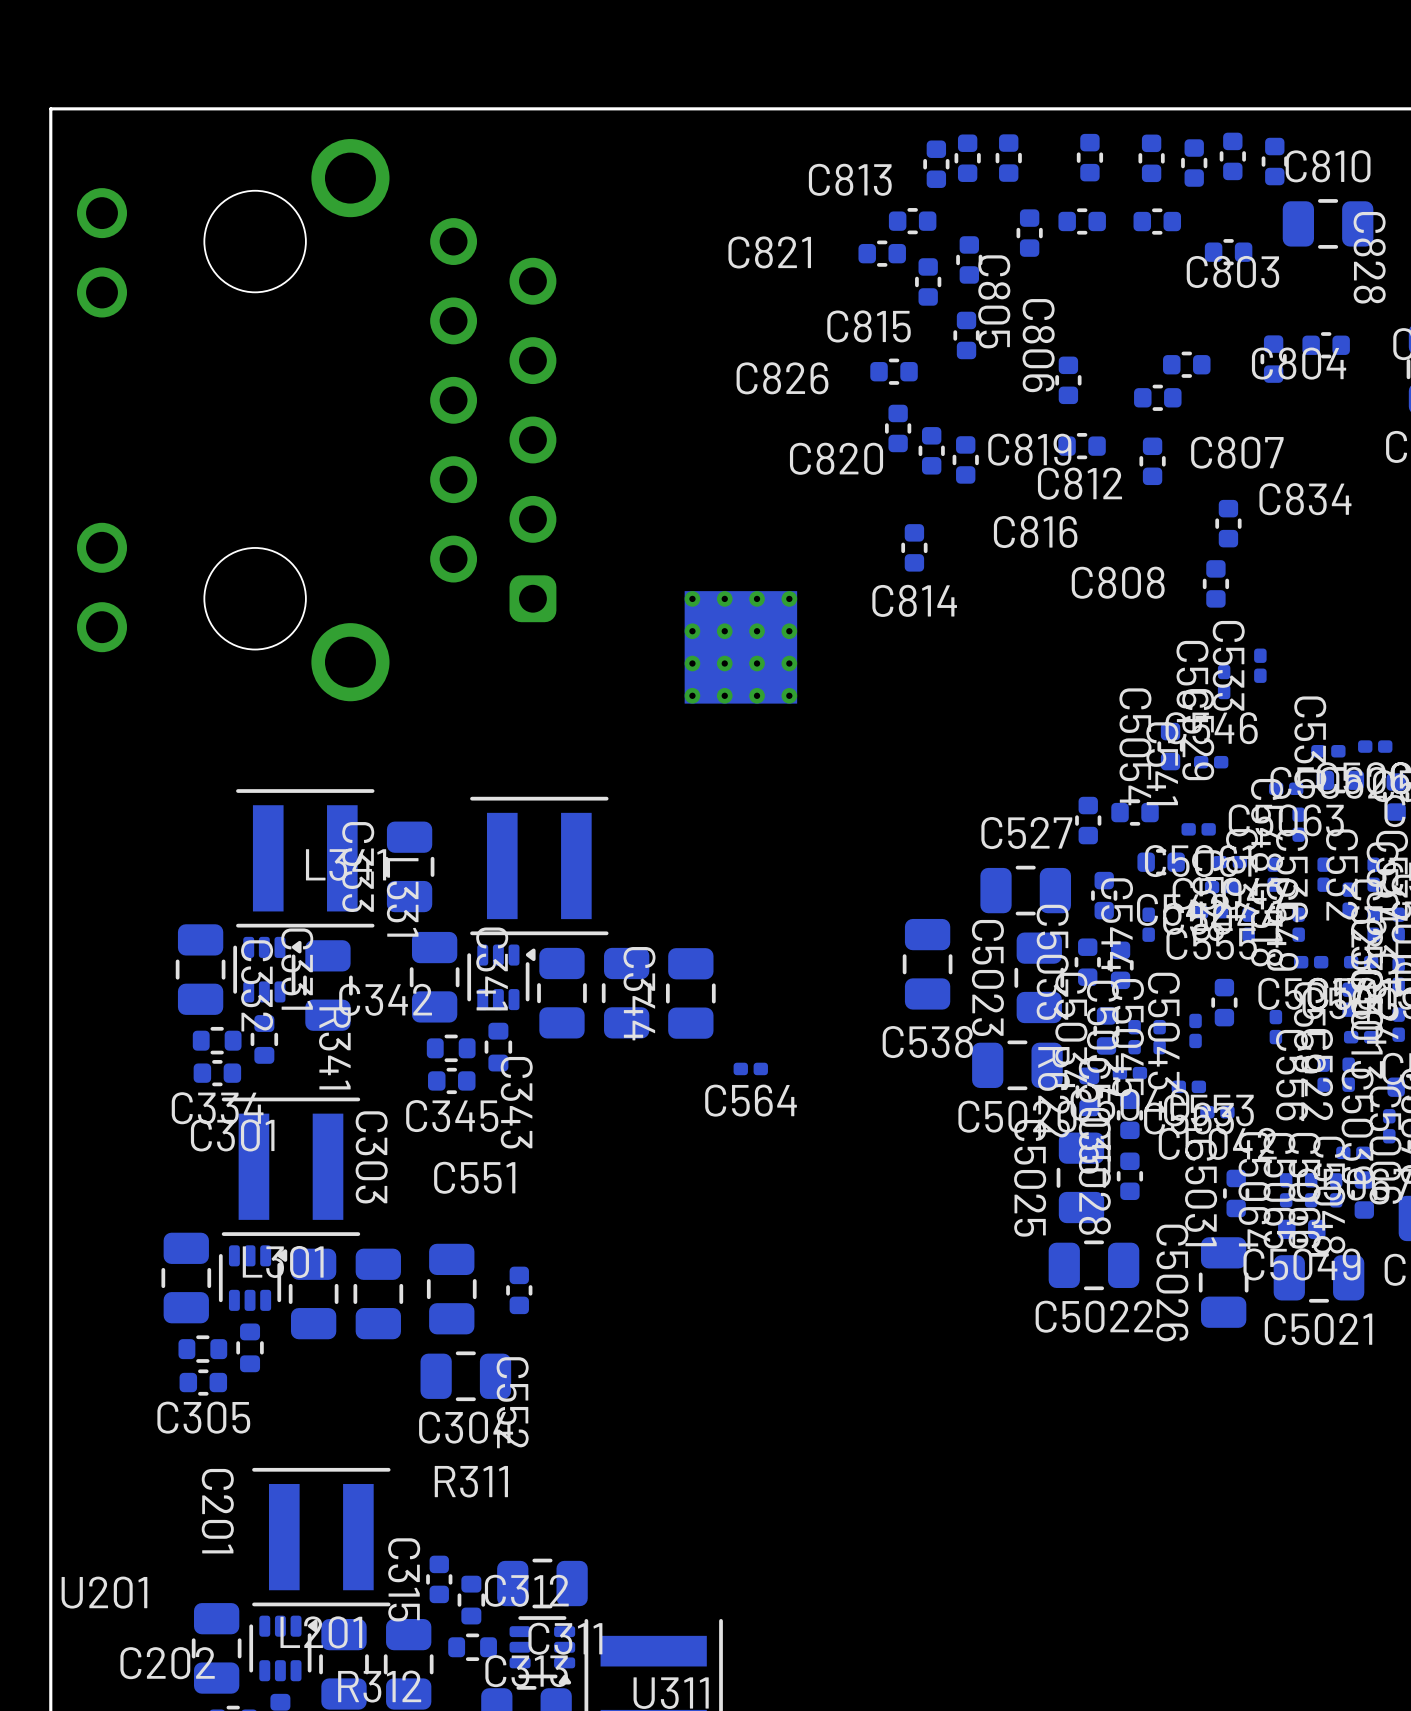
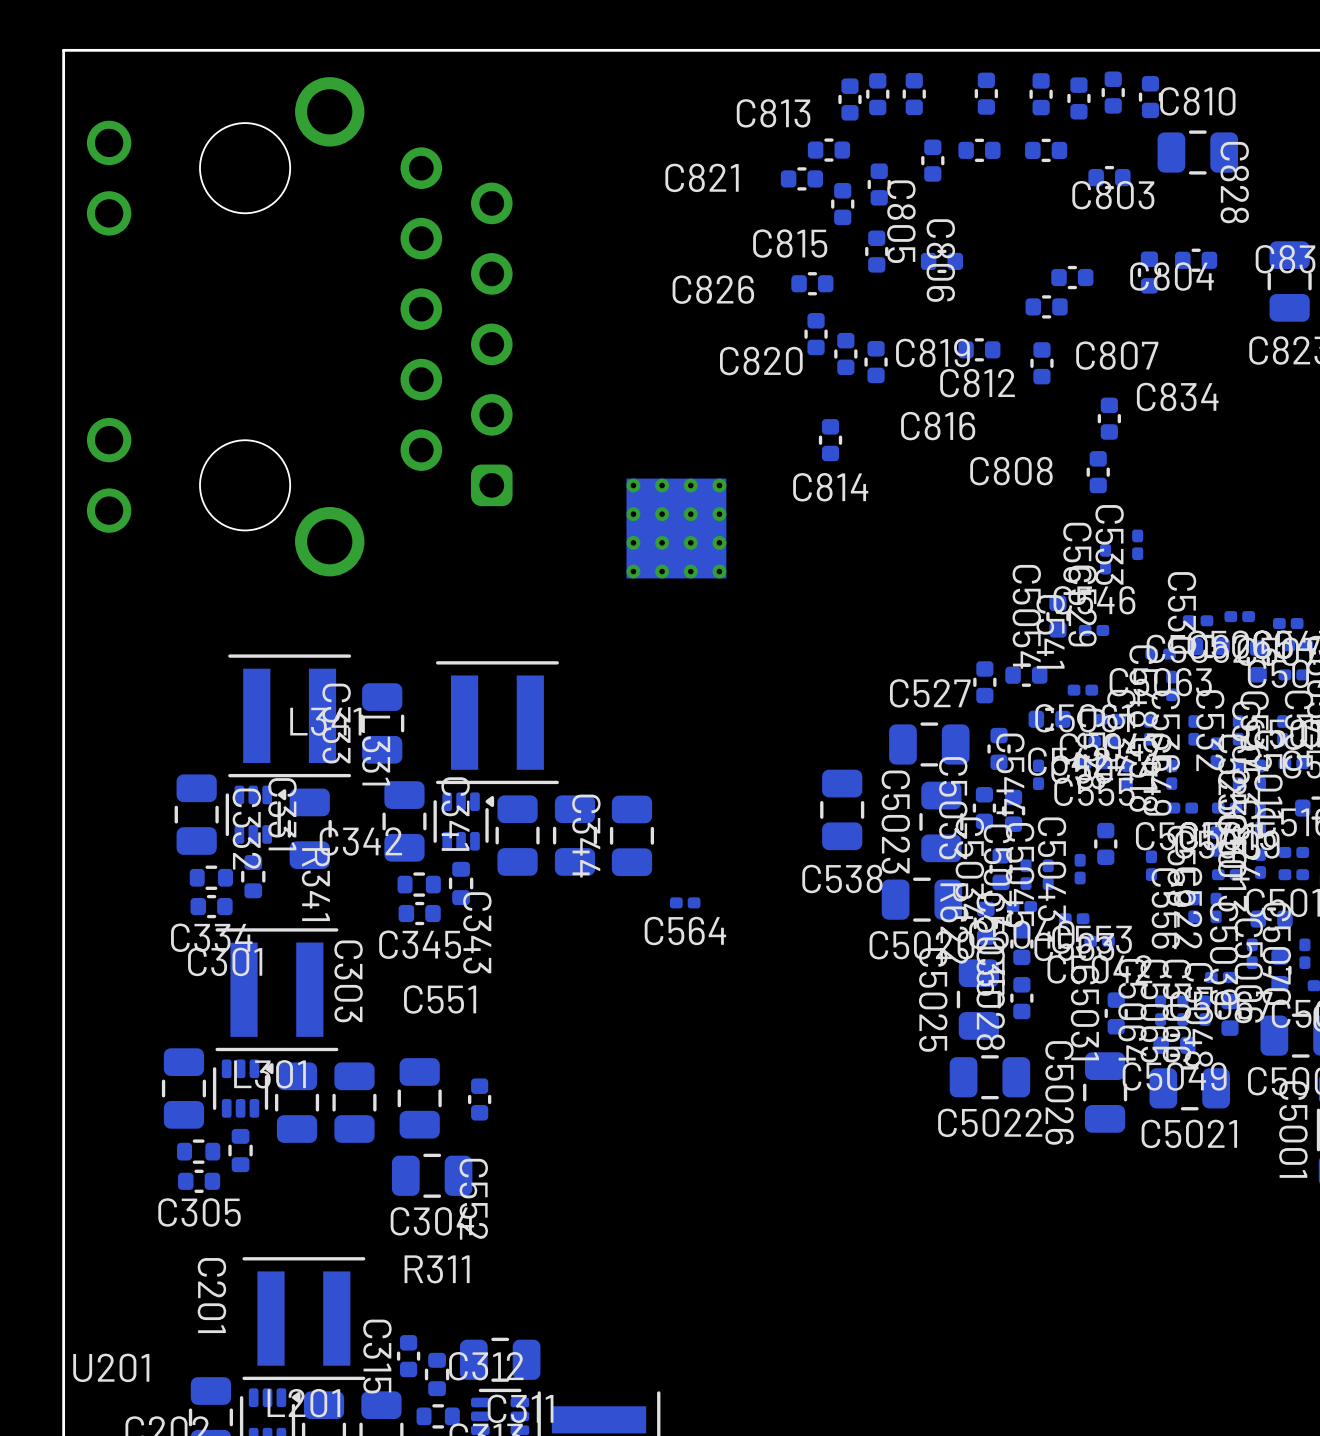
part rotation: 0° (1068, 380) -> 90° clockwise (941, 261)
part position: (1068, 380) -> (941, 261)

